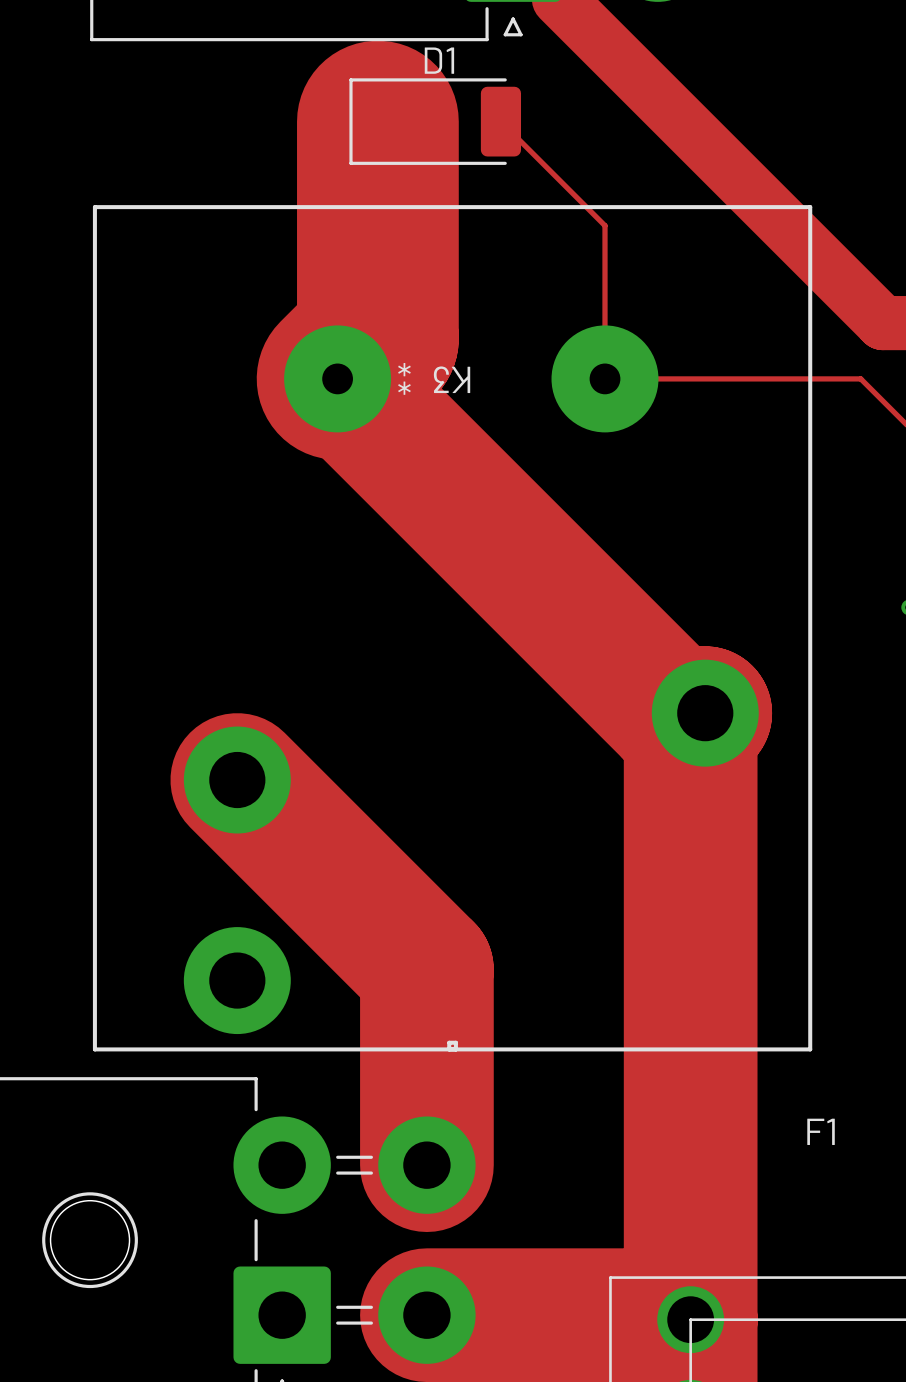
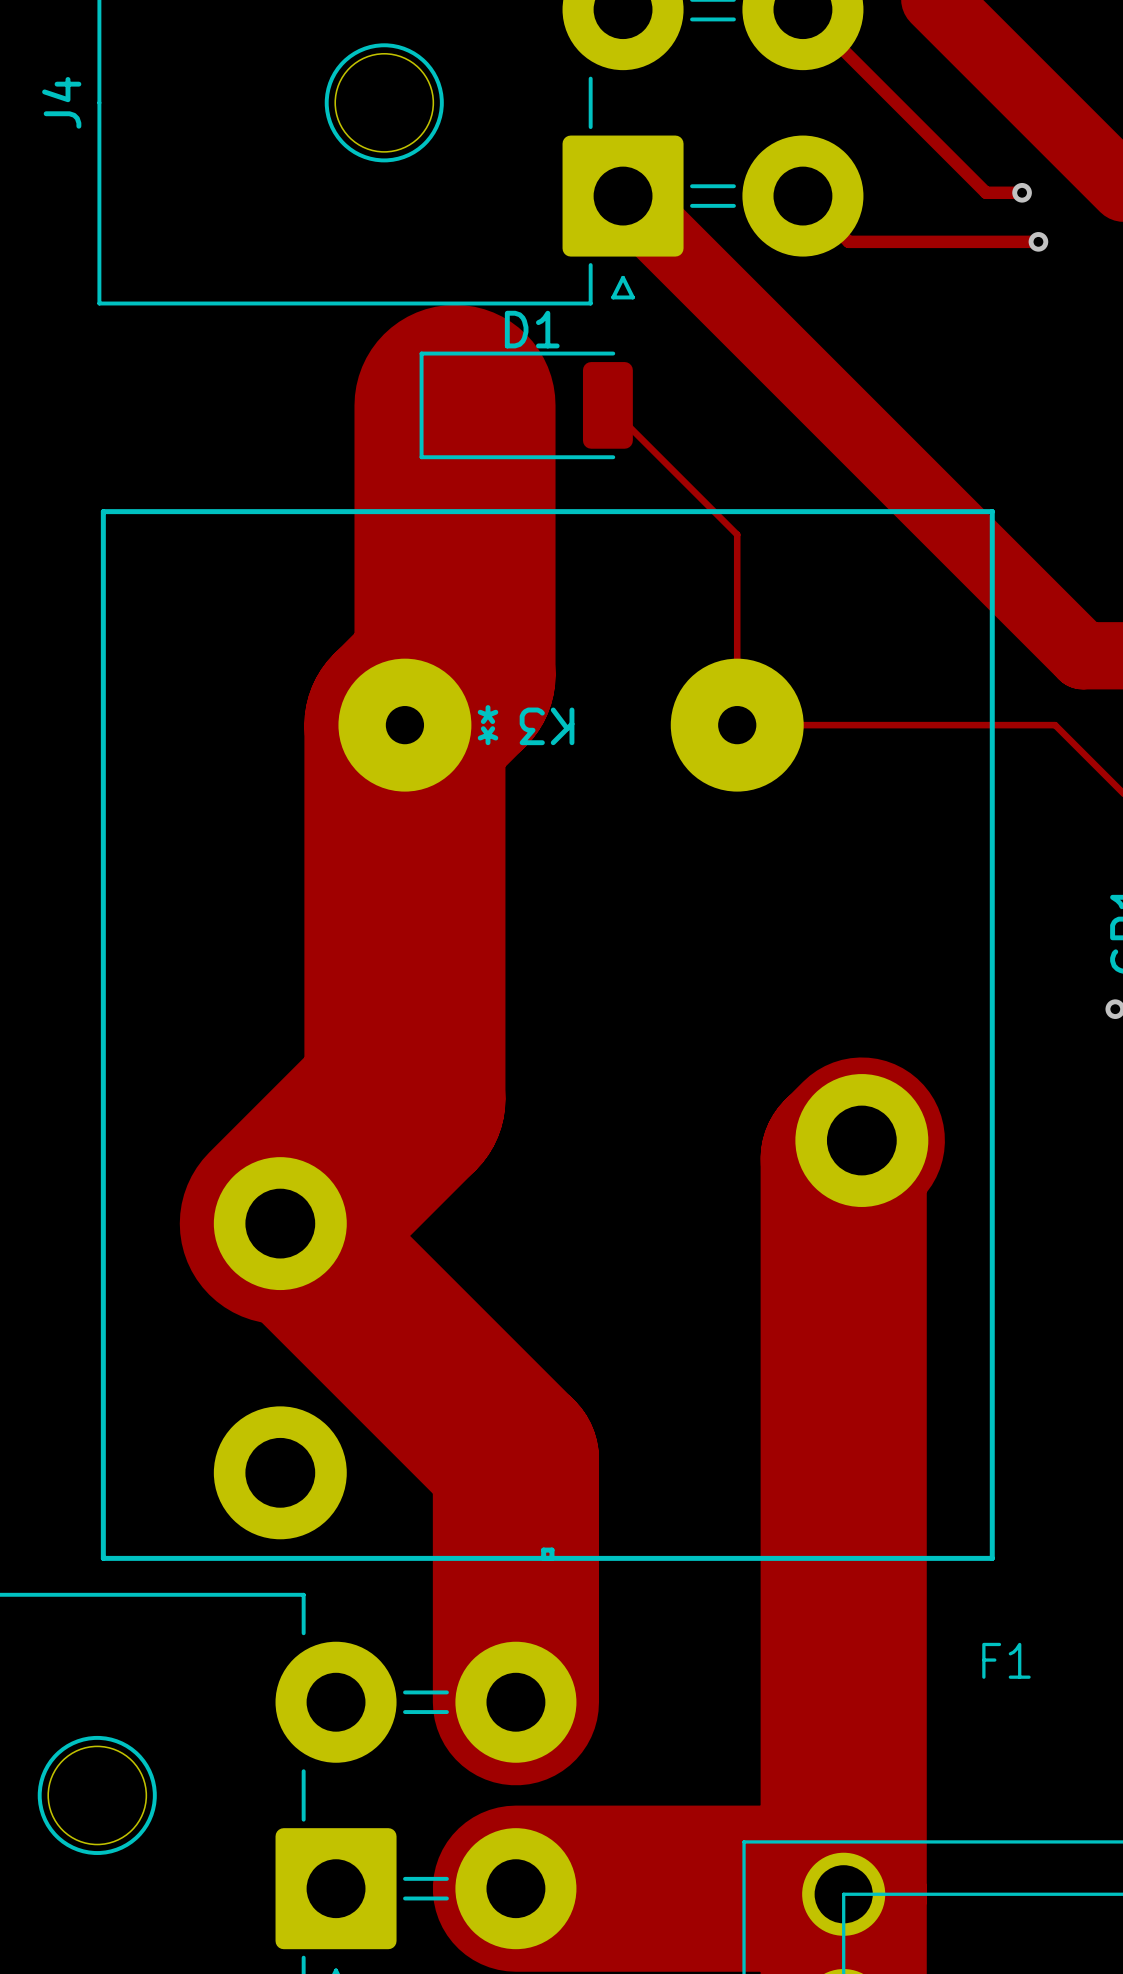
track: (337, 378) (671, 713) (705, 713) -> (404, 725) (404, 1098) (280, 1223)

